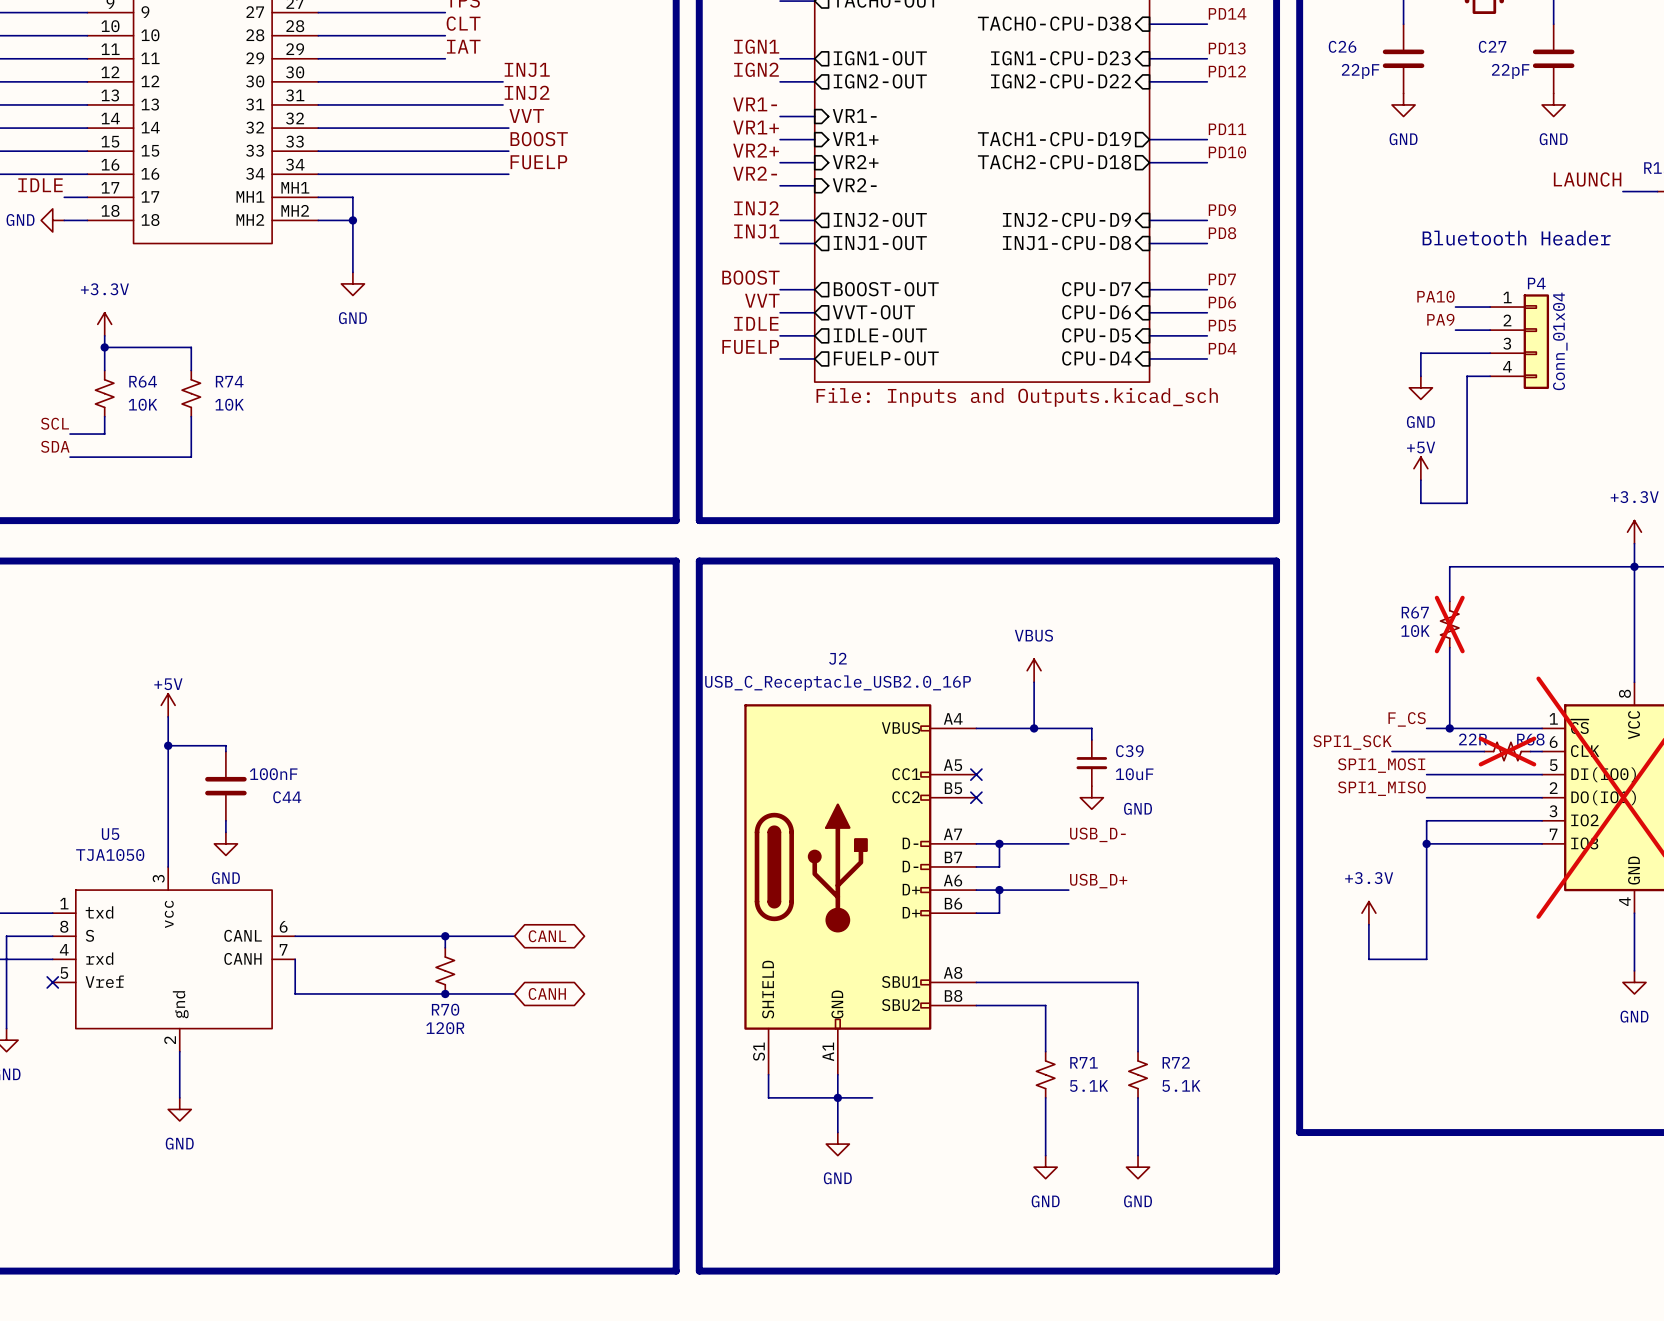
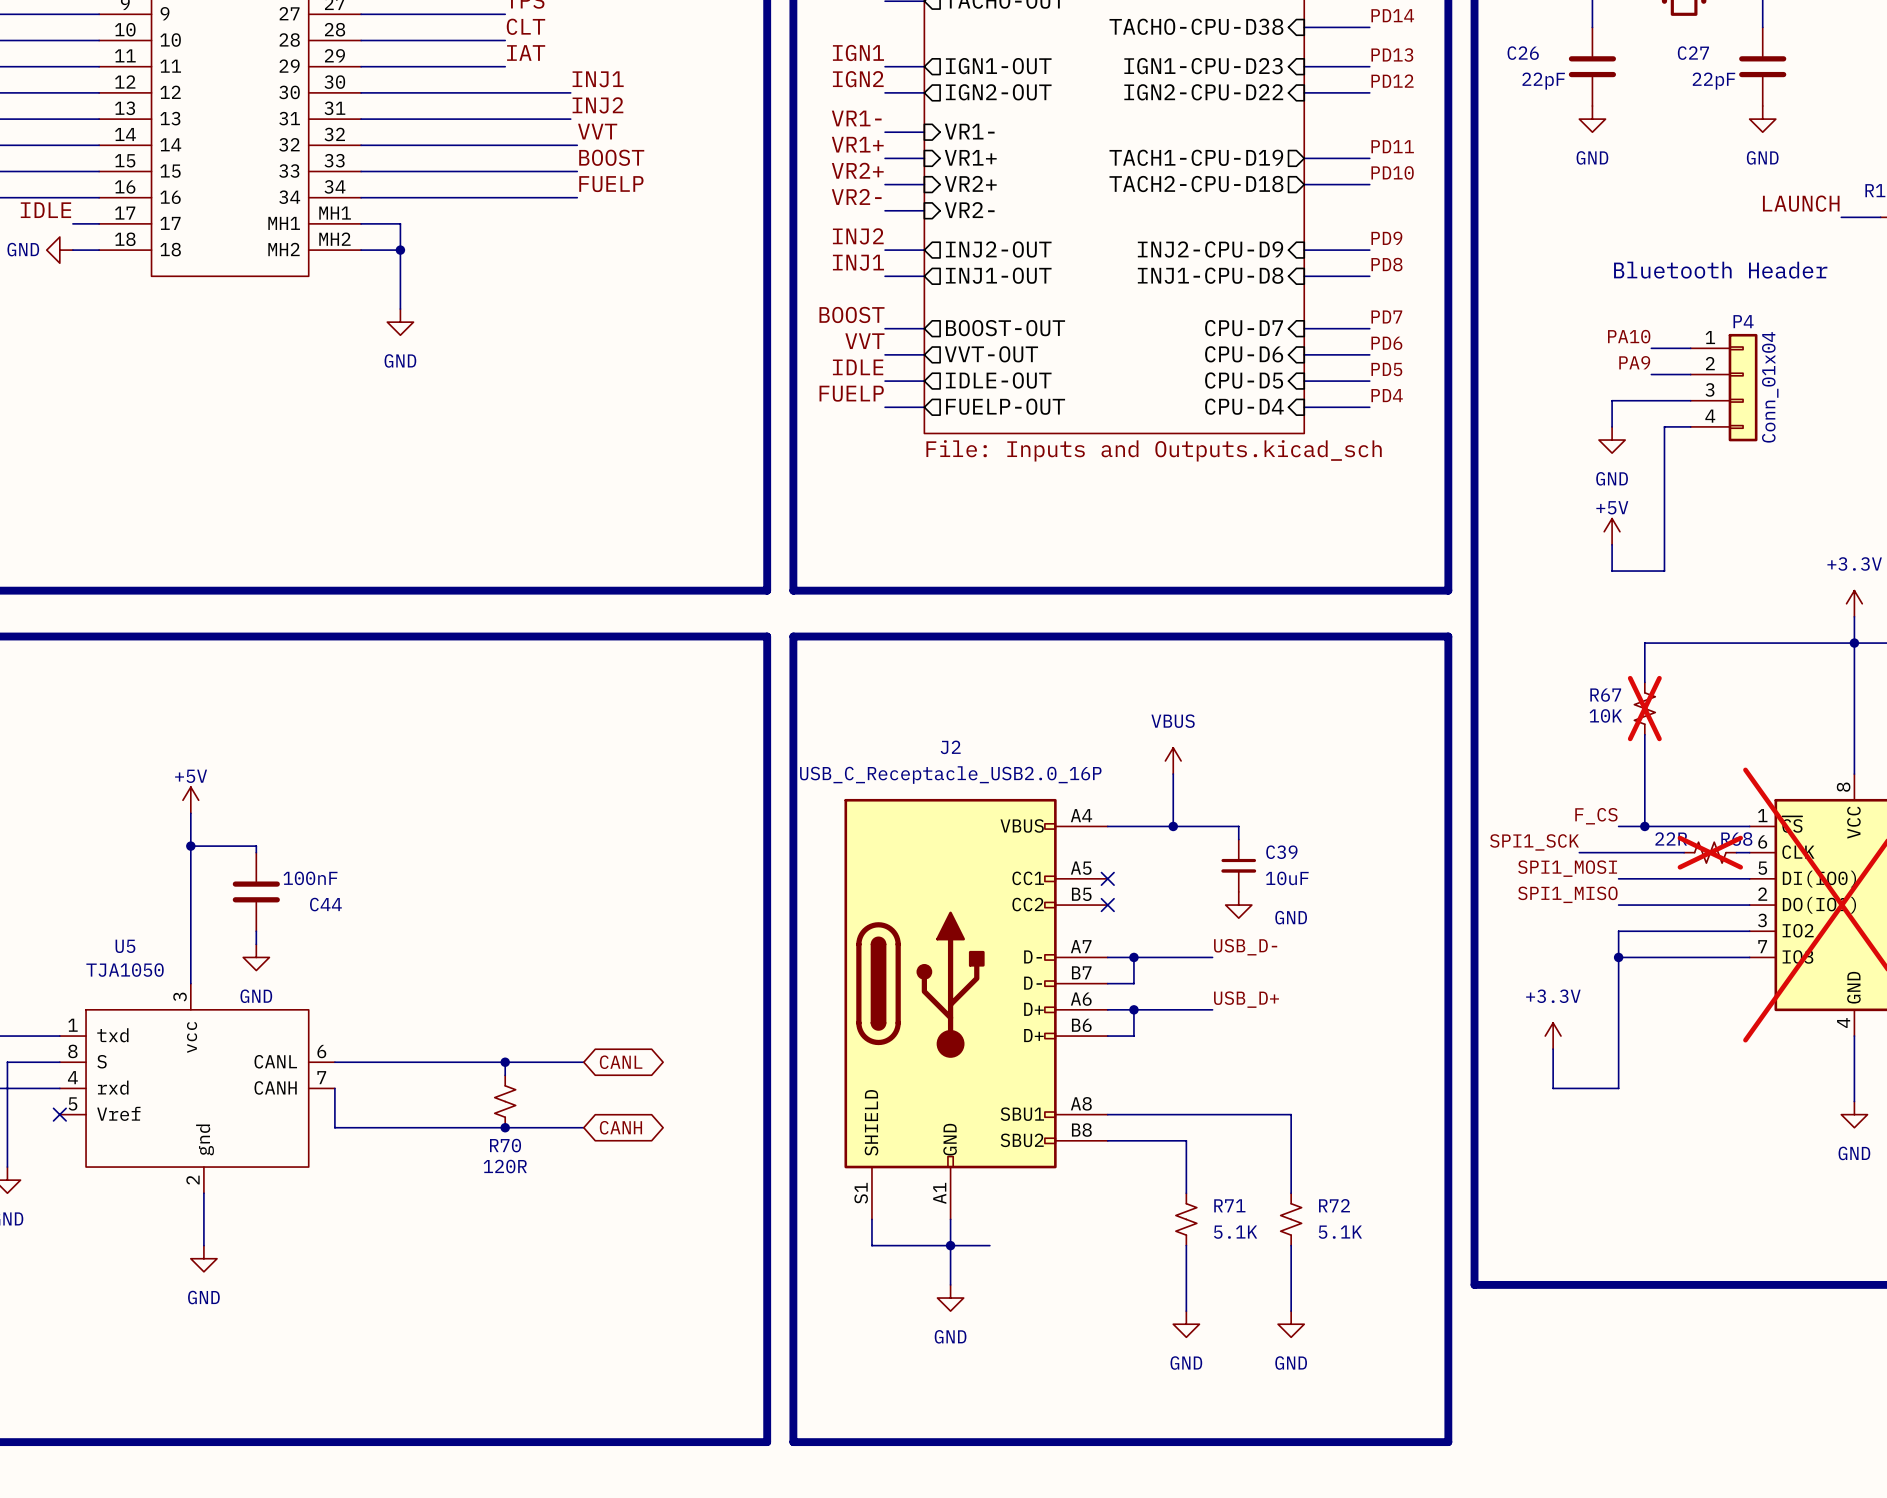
power symbol: +3.3V (104, 324) -> none
wire: (104, 335) (104, 370) -> none
wire: (104, 347) (191, 347) (191, 370) -> none
junction: (104, 347) -> none
R64: 10K (104, 393) -> none
R74: 10K (191, 393) -> none
wire: (104, 416) (104, 434) (70, 434) -> none
wire: (191, 416) (191, 457) (70, 457) -> none
label: SCL (55, 423) -> none
label: SDA (55, 446) -> none

